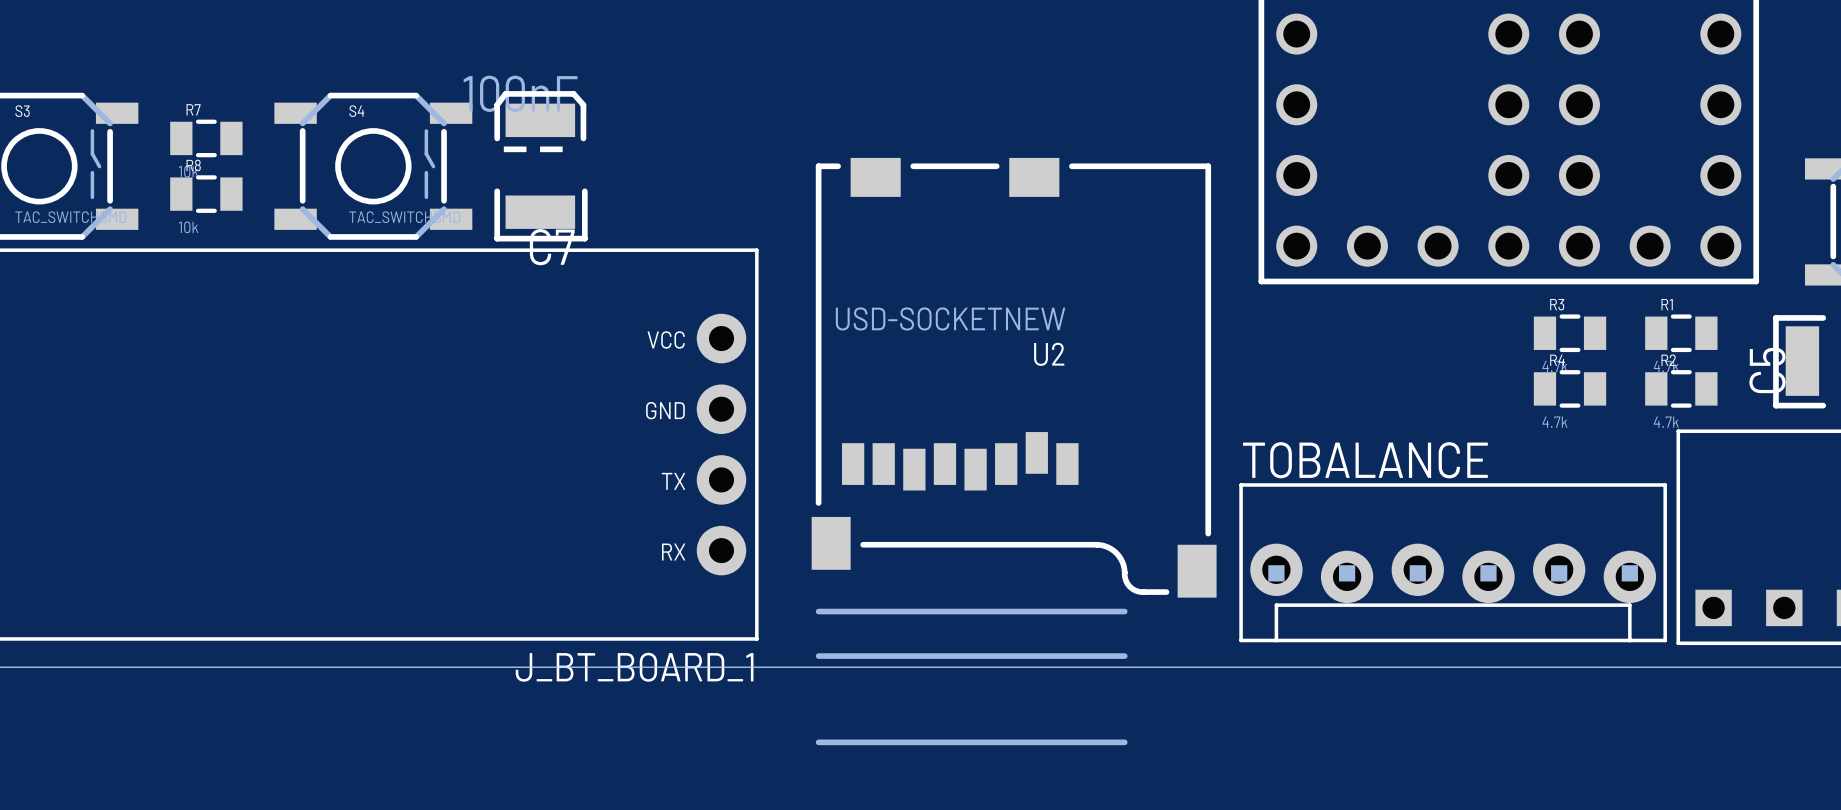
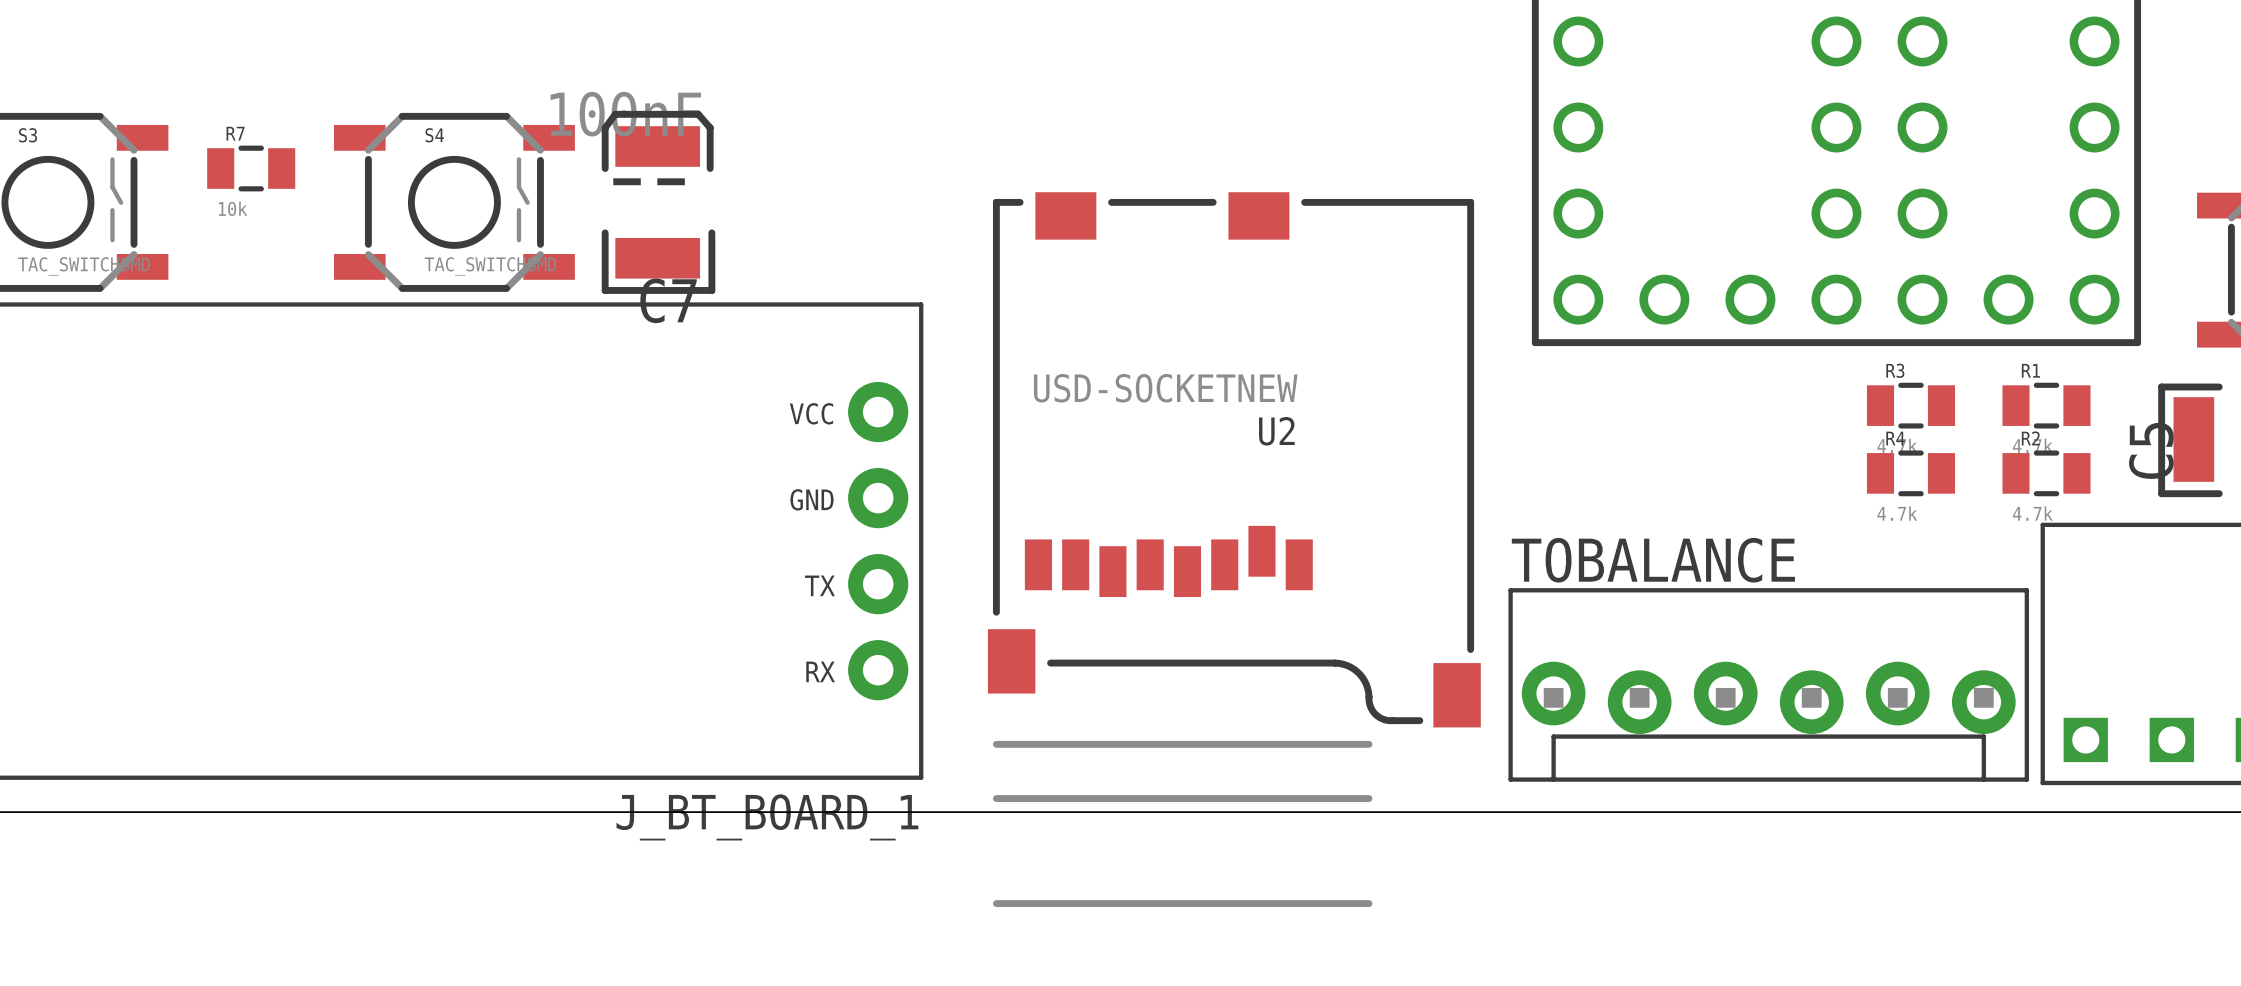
R8: 10k (206, 194) -> none

